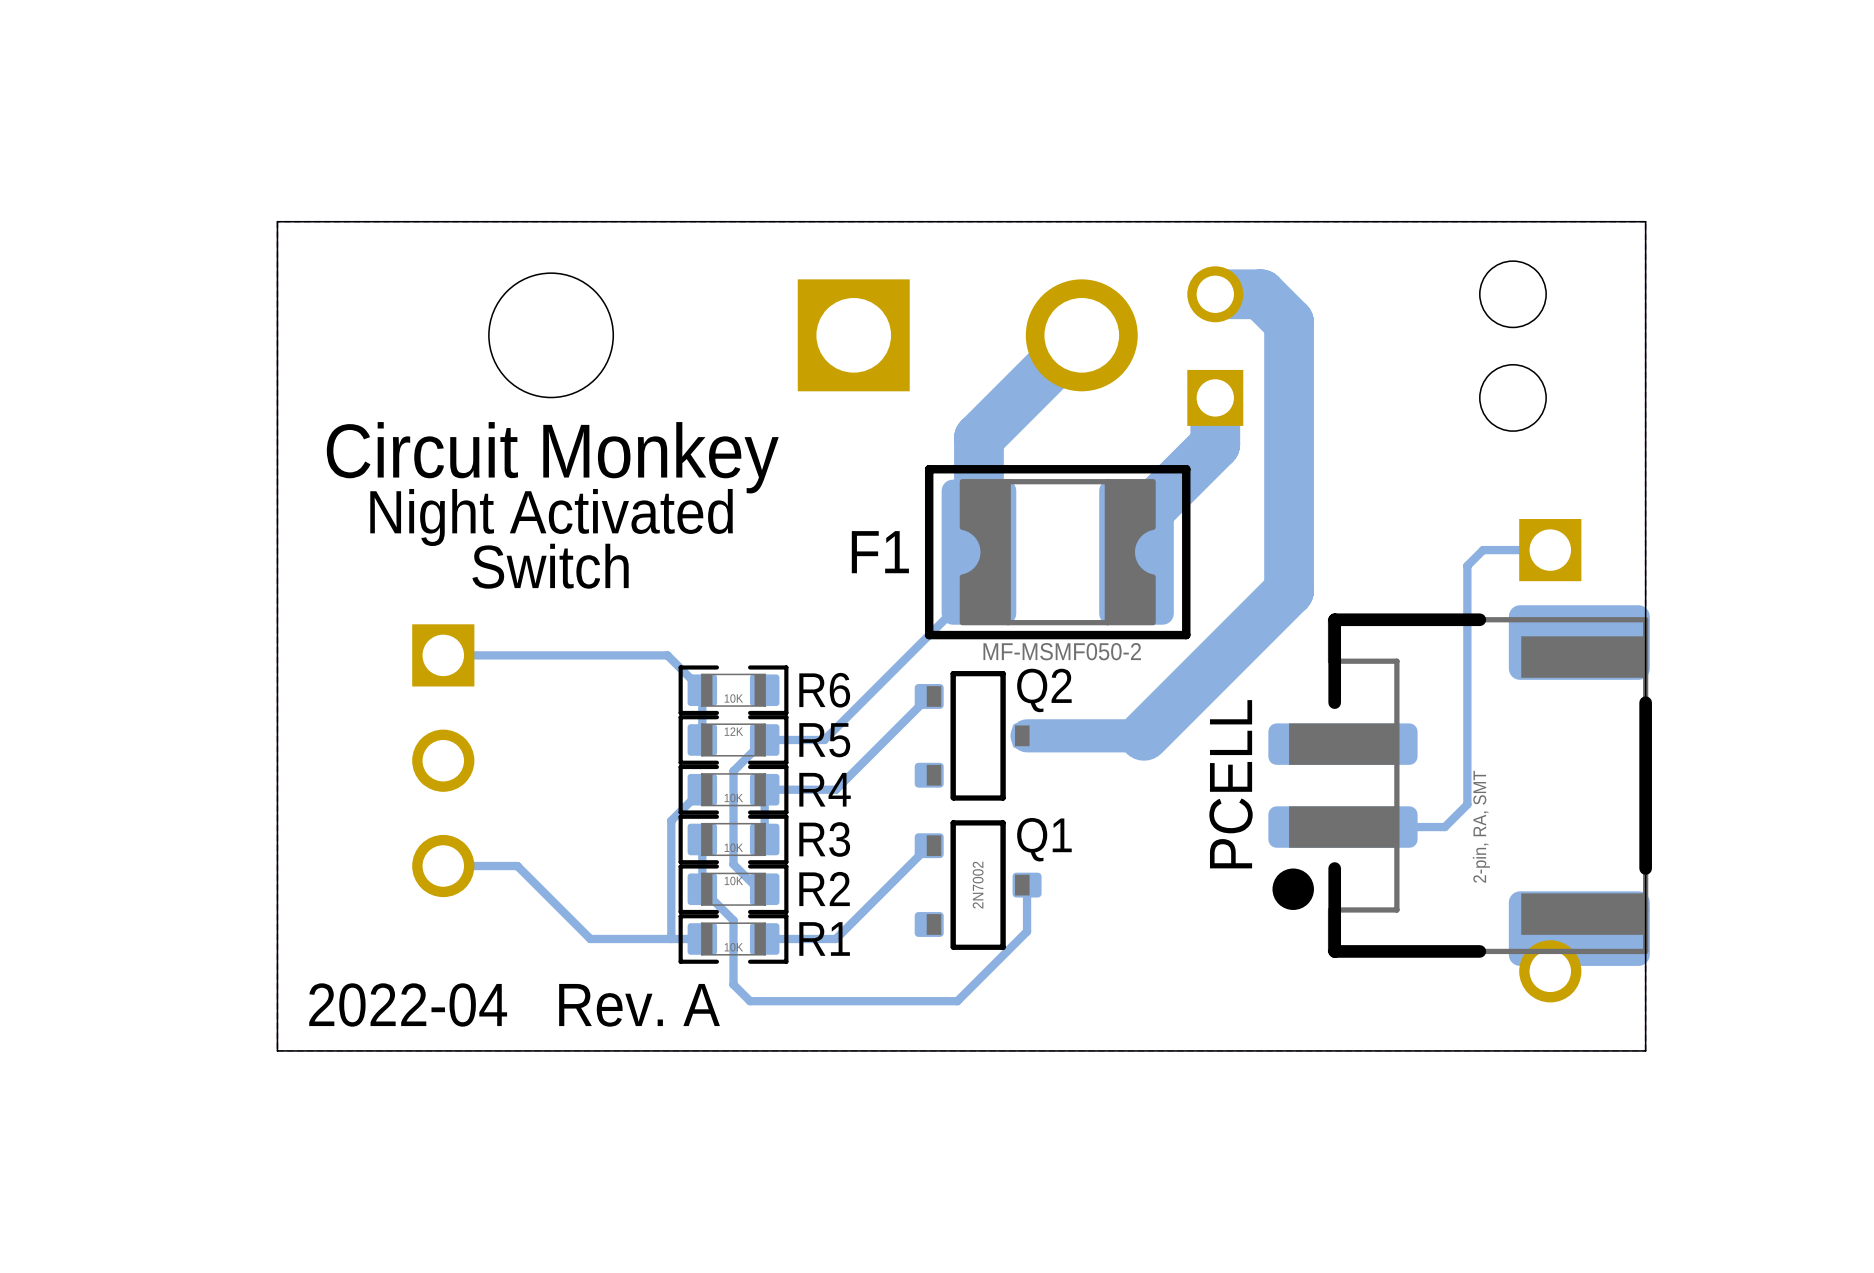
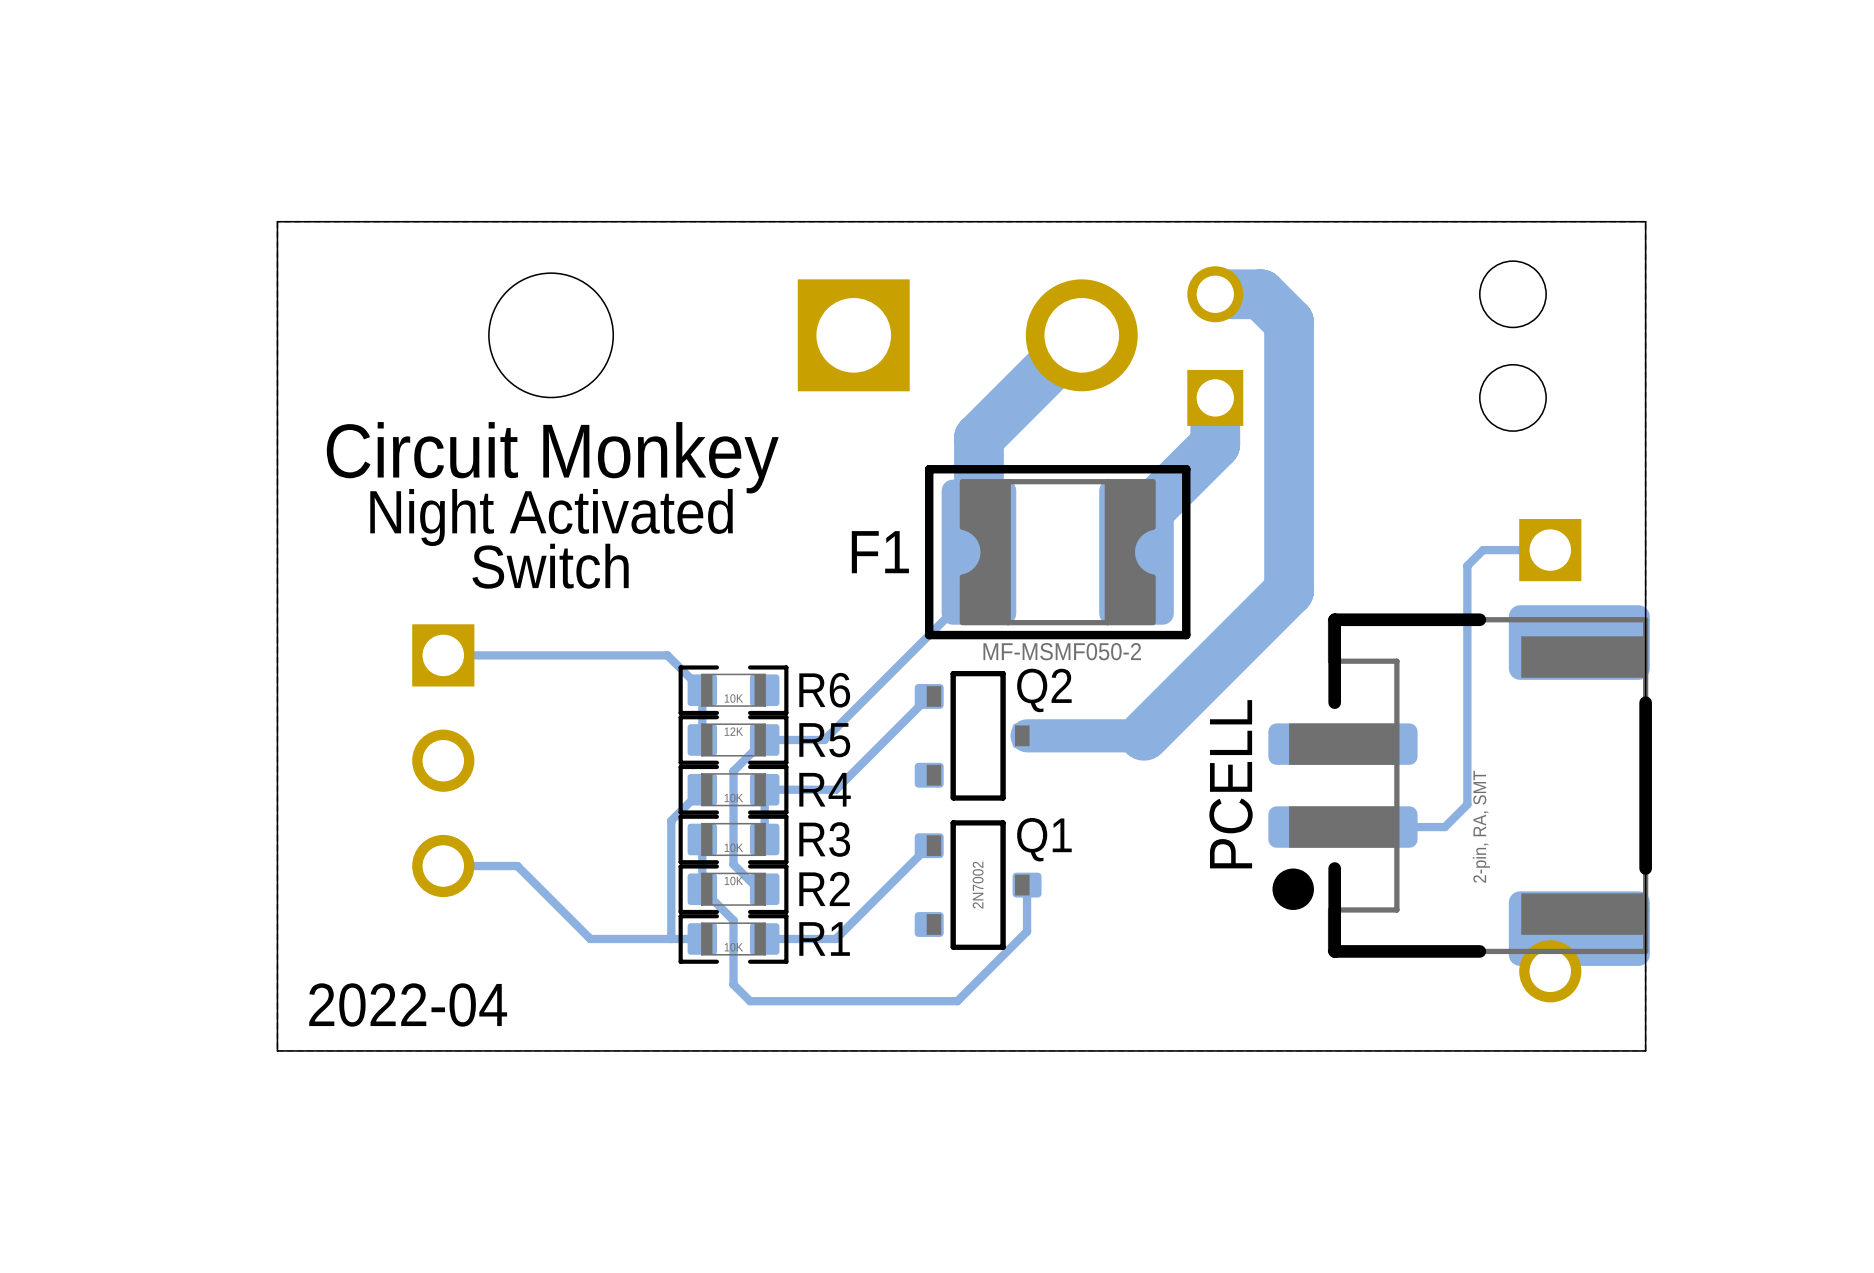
text: 2022-04 Rev. A (514, 1004) -> 2022-04 (408, 1004)

